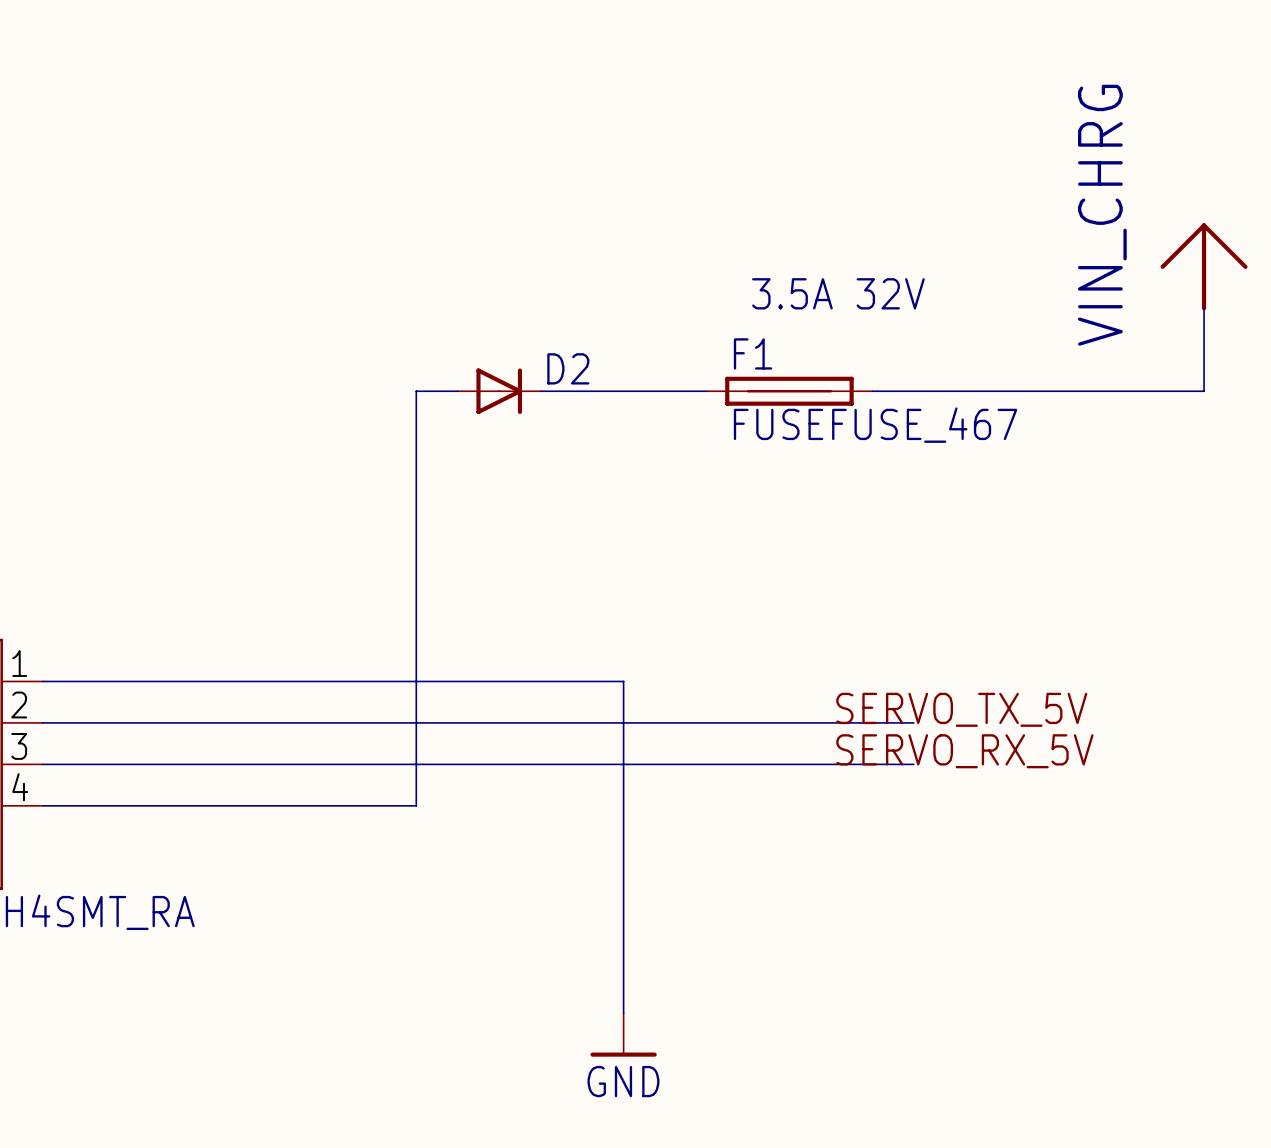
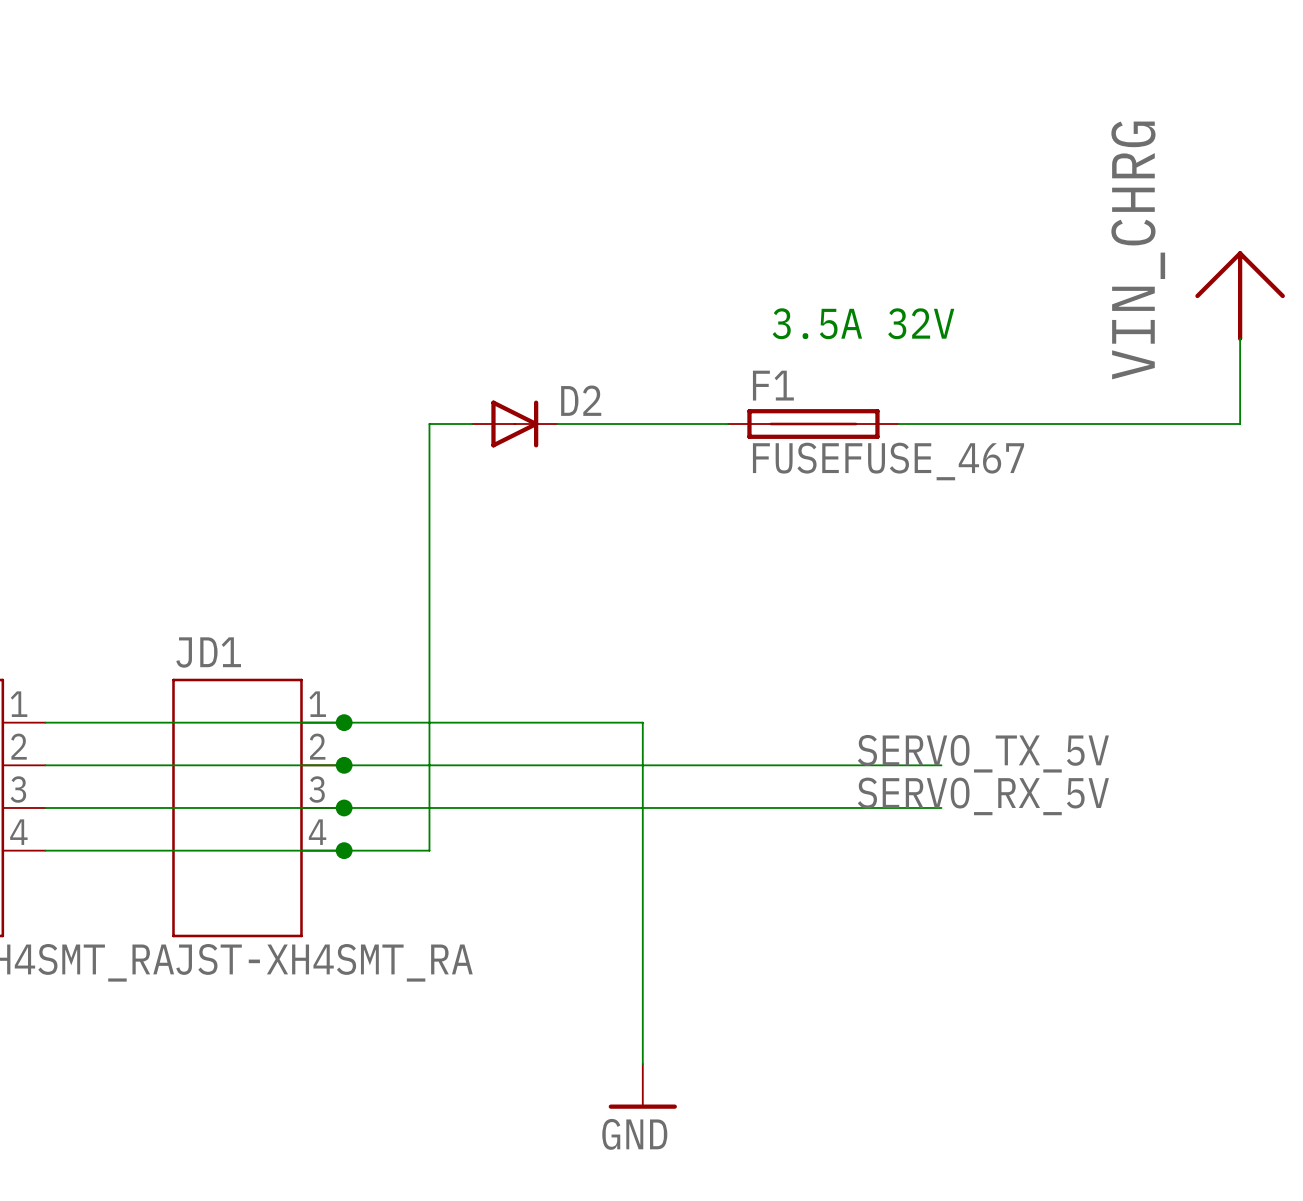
junction: none -> (344, 722)
junction: none -> (344, 765)
JD1: none -> JST-XH4SMT_RA (258, 807)
junction: none -> (344, 807)
junction: none -> (344, 850)

